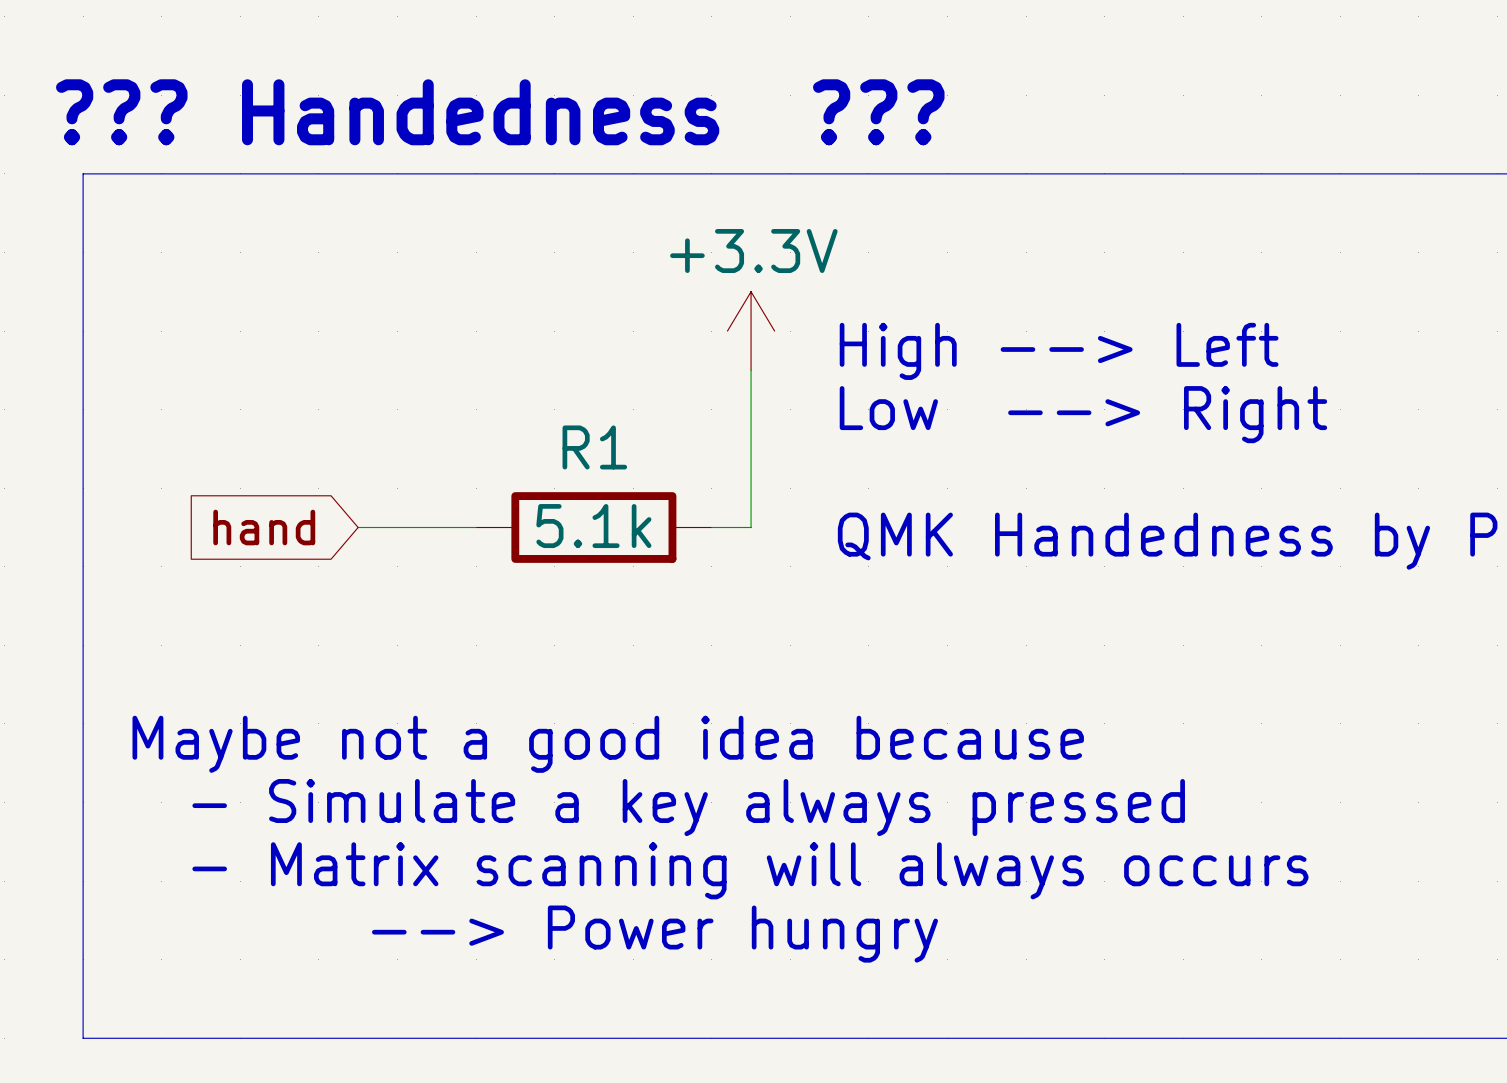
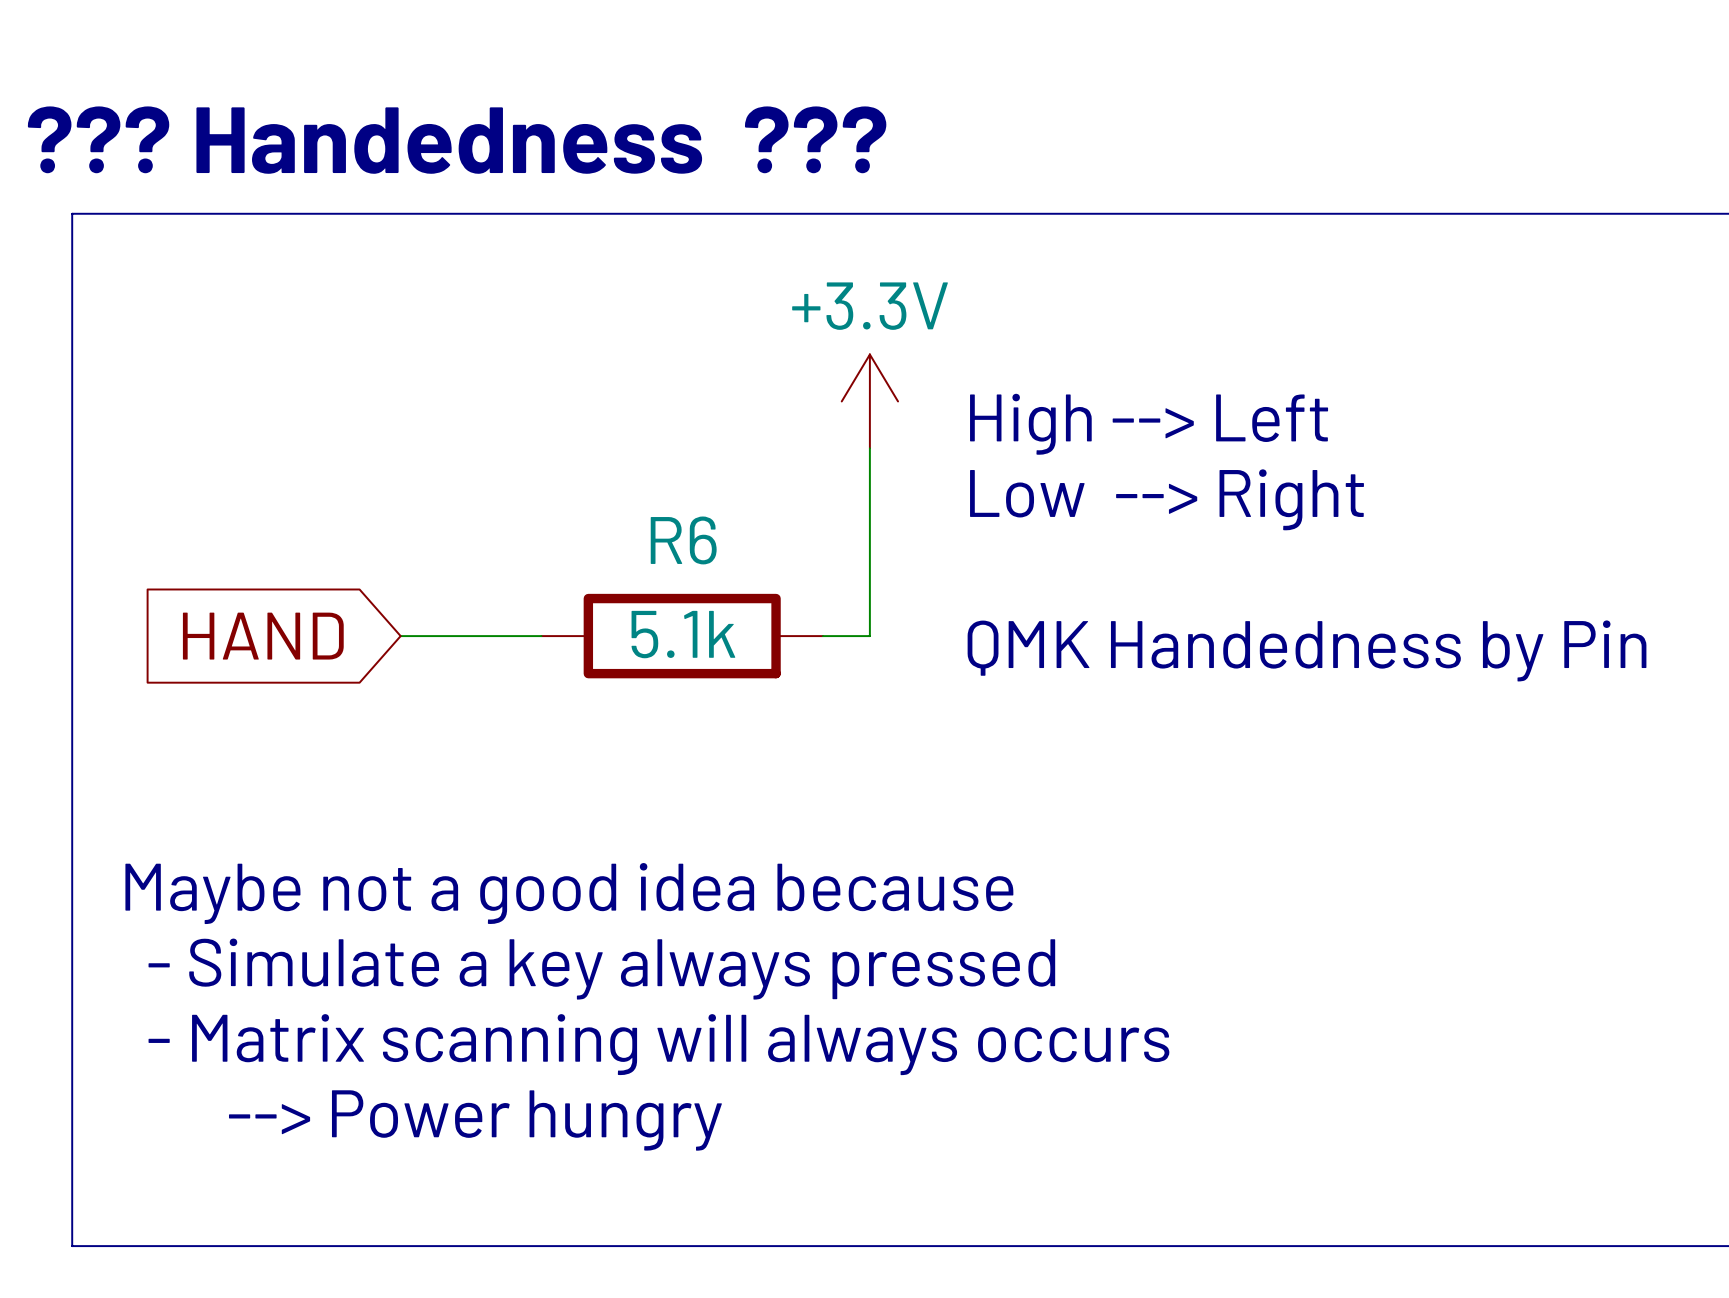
R1 name: R1 (594, 447) -> R6 (683, 540)
global label: hand (264, 527) -> HAND (263, 636)

